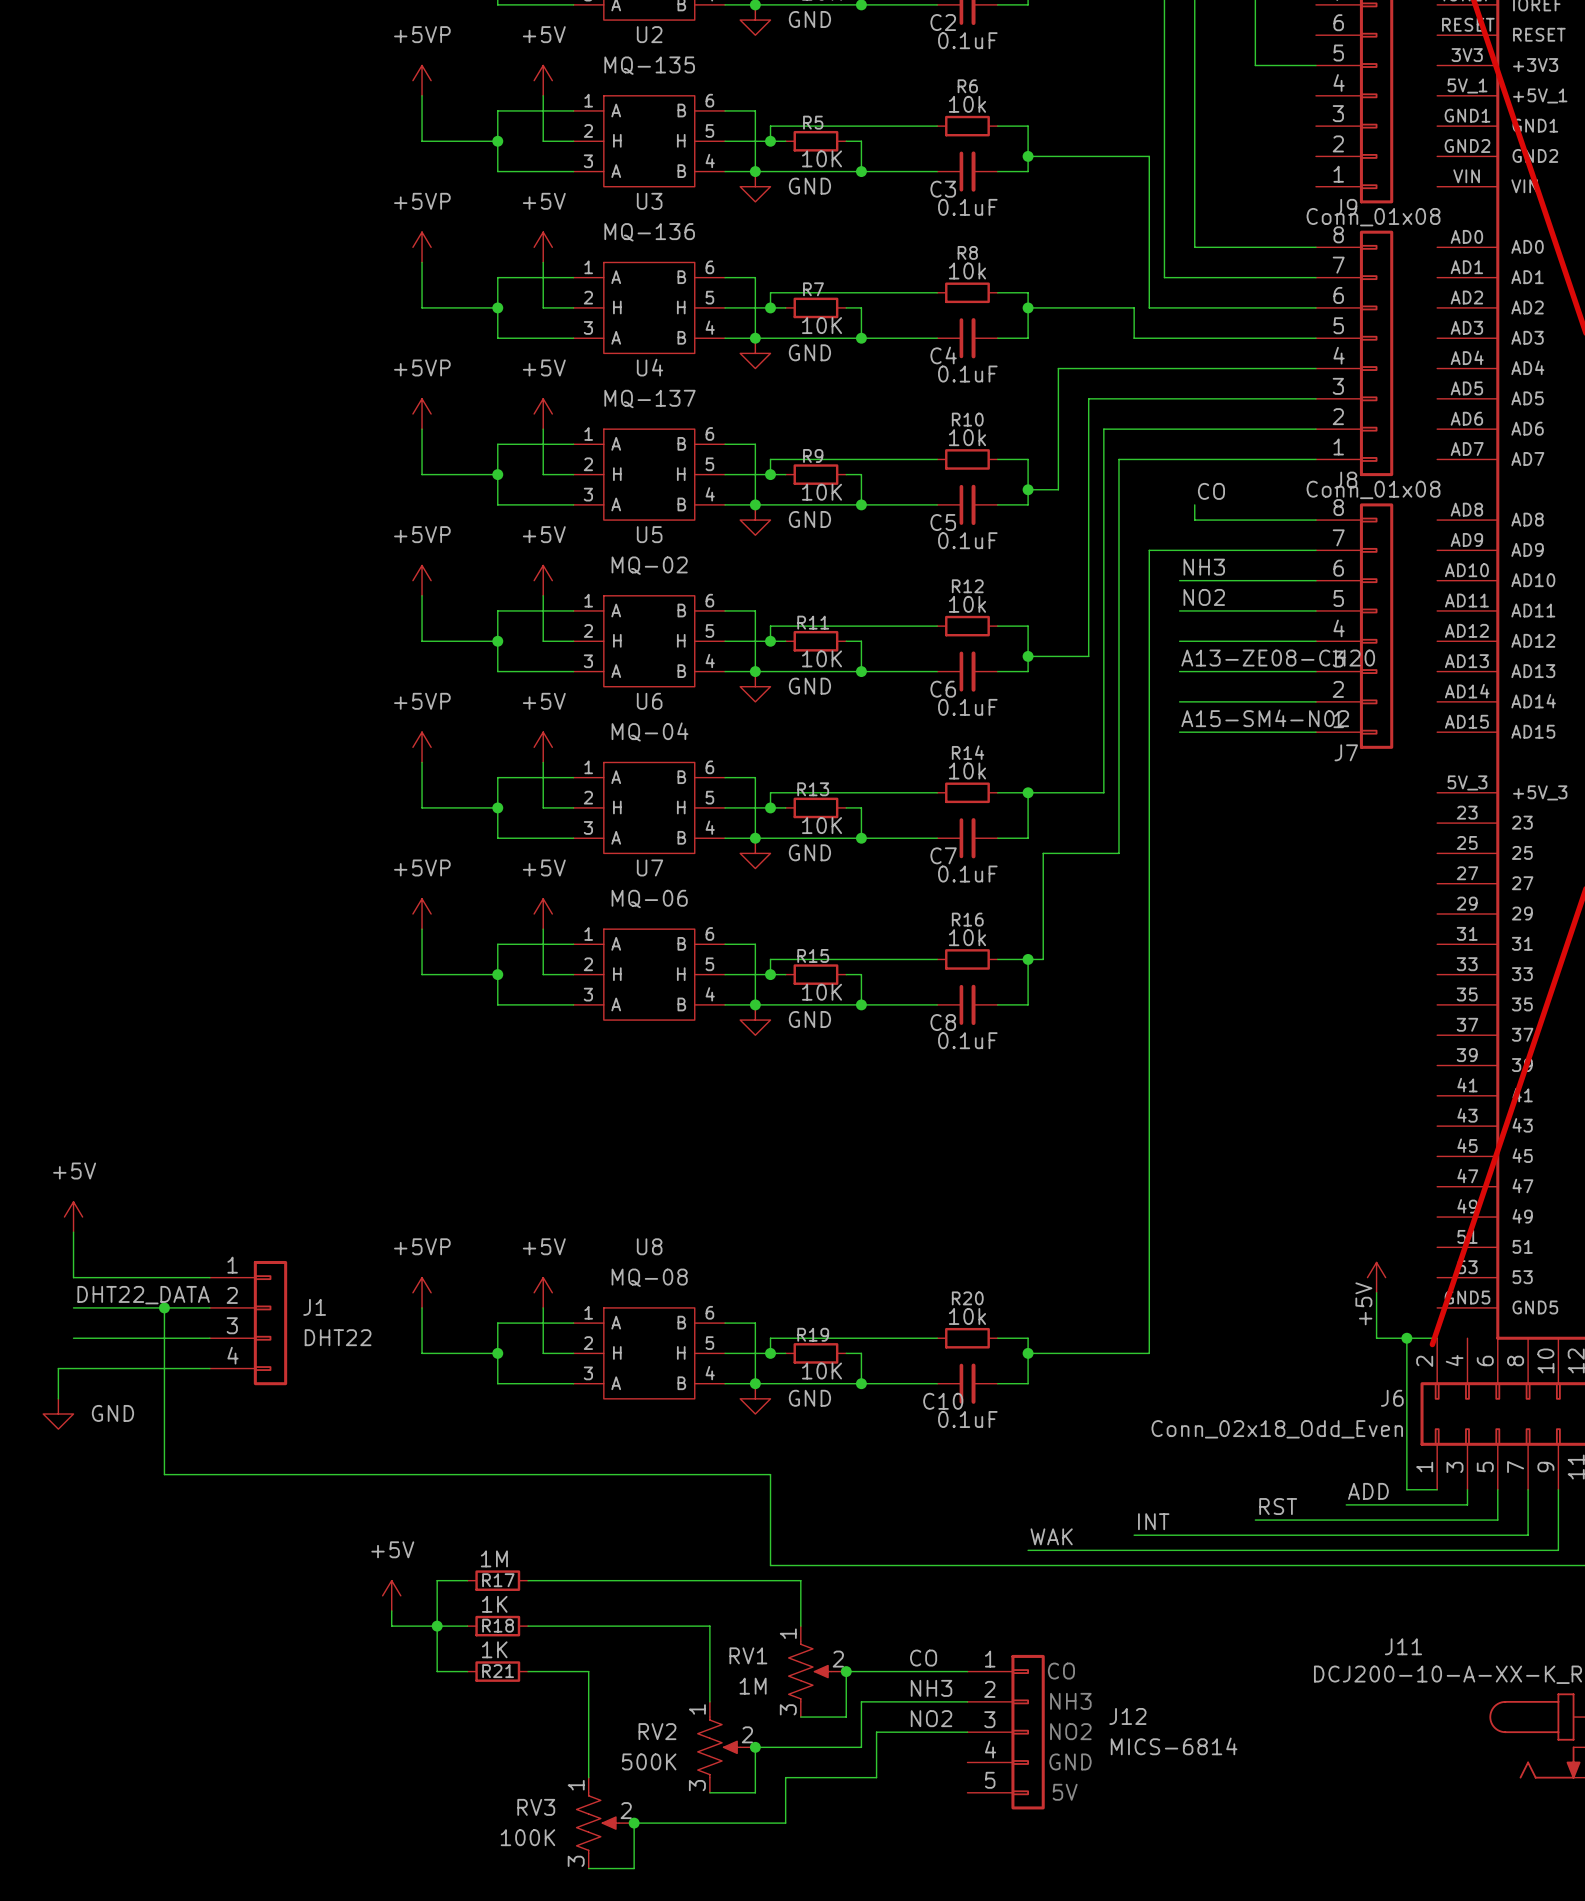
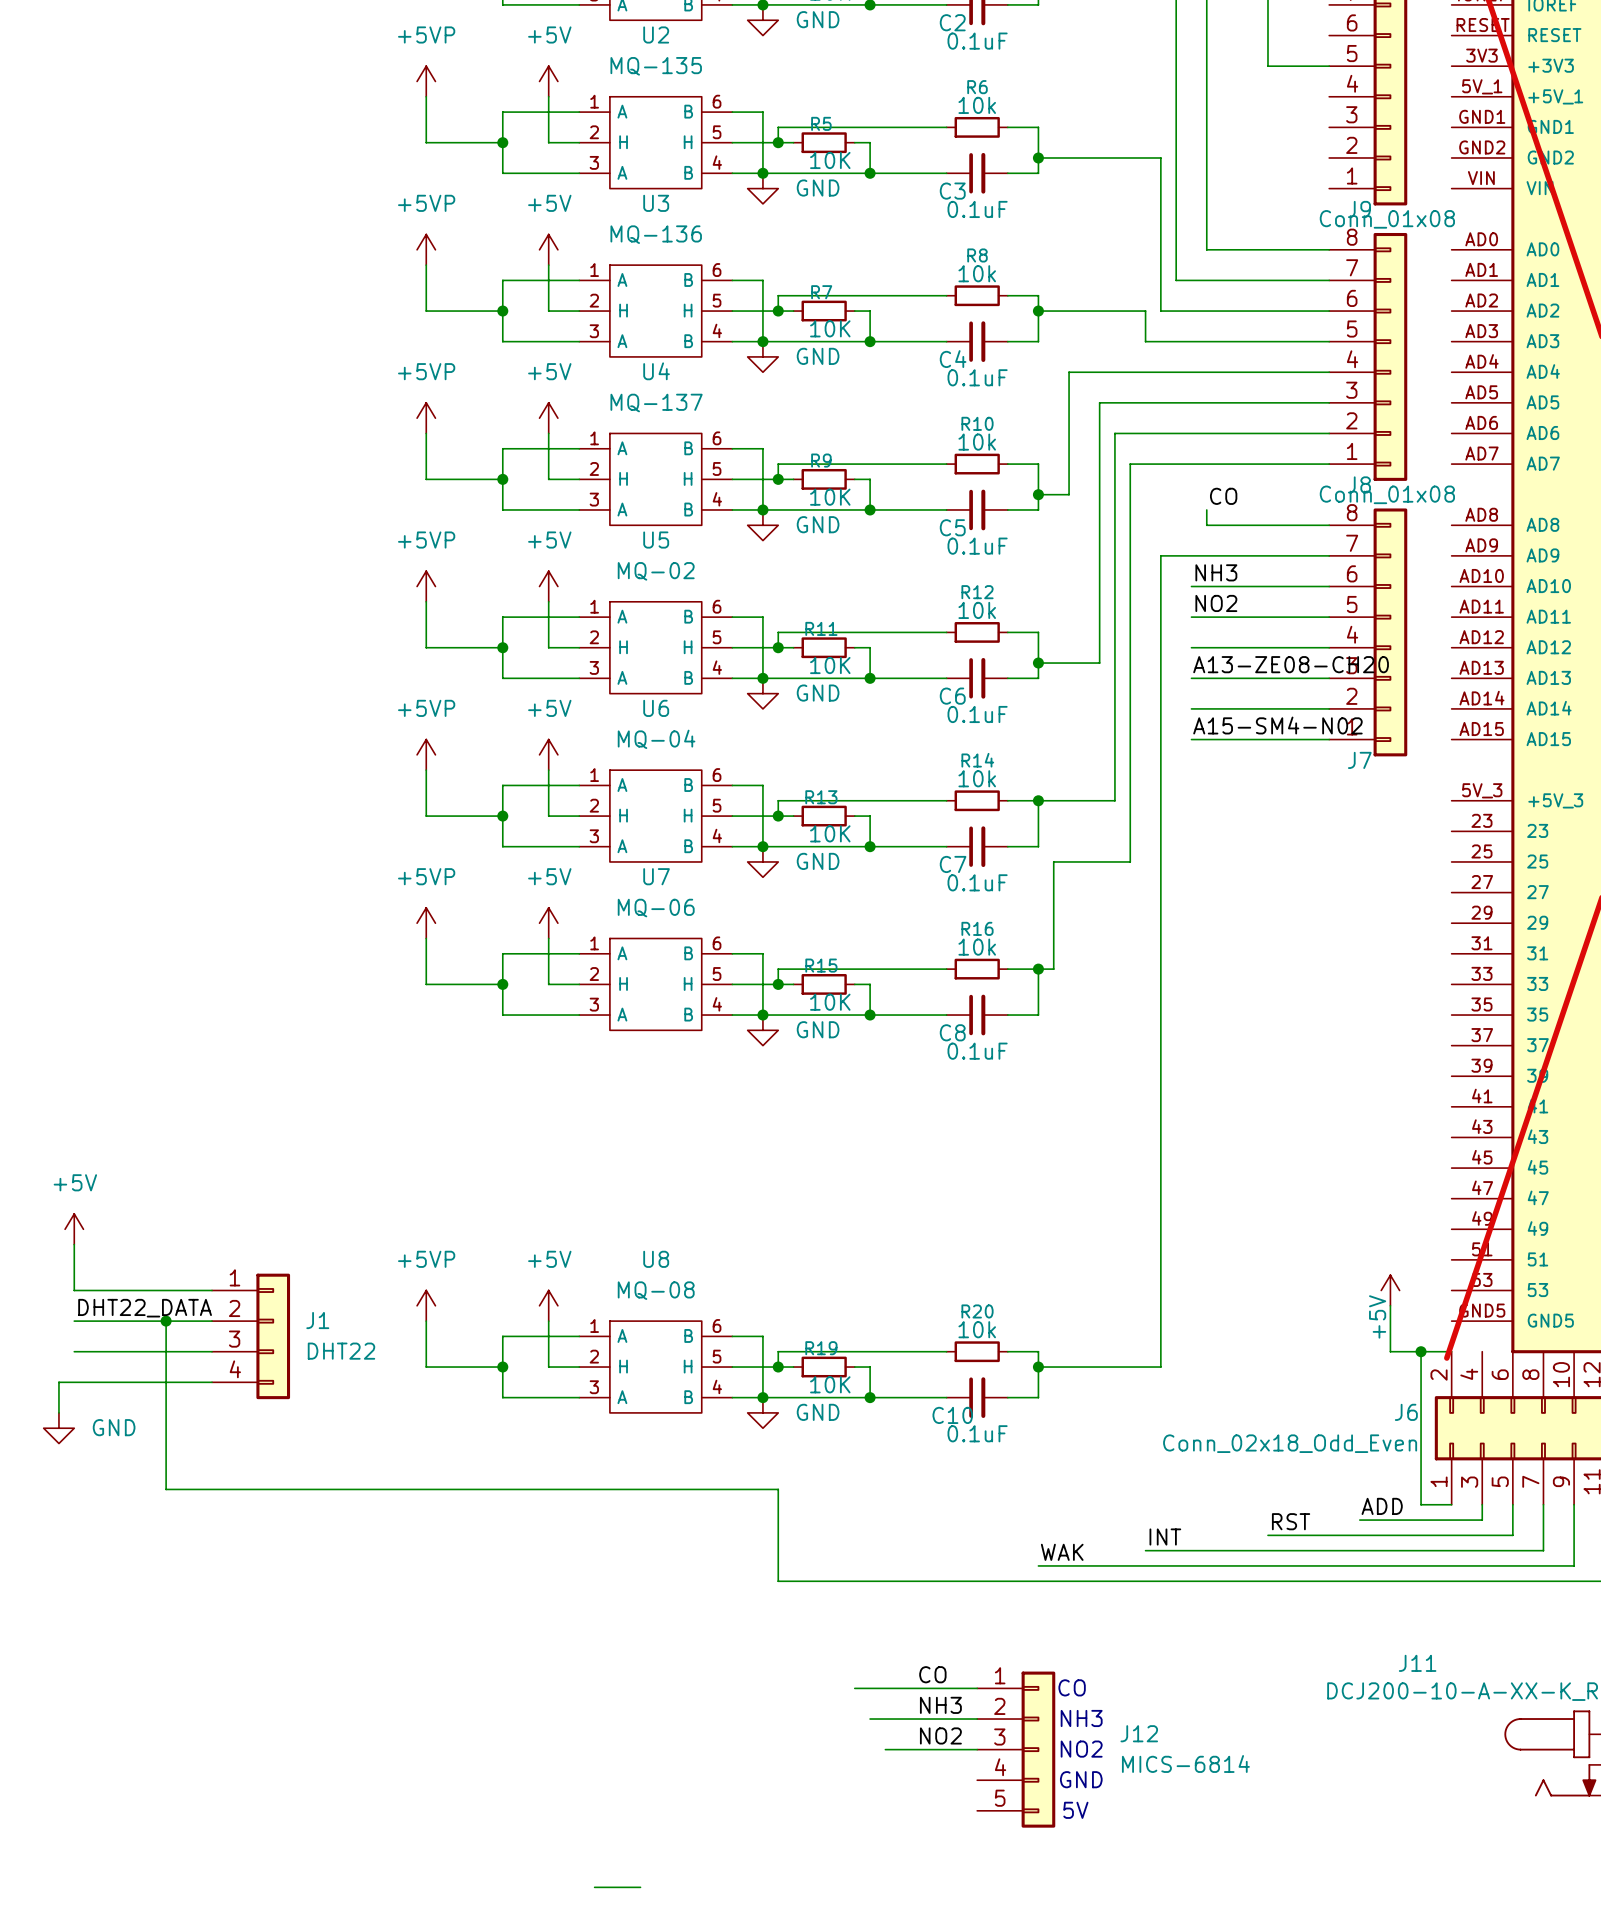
wire: (467, 1580) (437, 1580) (437, 1671) (467, 1671) -> none
R17: 1M (497, 1580) -> none
wire: (528, 1580) (800, 1580) (800, 1626) -> none
power symbol: +5V (391, 1595) -> none
wire: (391, 1610) (391, 1626) (467, 1626) -> none
junction: (437, 1626) -> none
R18: 1K (497, 1626) -> none
wire: (528, 1626) (709, 1626) (709, 1701) -> none
R21: 1K (497, 1671) -> none
wire: (528, 1671) (588, 1671) (588, 1777) -> none
RV1: 1M (817, 1671) -> none
wire: (846, 1671) (846, 1717) (800, 1717) -> none
junction: (846, 1671) -> none
wire: (861, 1701) (861, 1747) (755, 1747) (755, 1792) (709, 1792) -> none
wire: (876, 1732) (876, 1777) (785, 1777) (785, 1823) (634, 1823) (634, 1868) -> none
RV2: 500K (726, 1747) -> none
junction: (755, 1747) -> none
RV3: 100K (605, 1823) -> none
junction: (634, 1823) -> none

